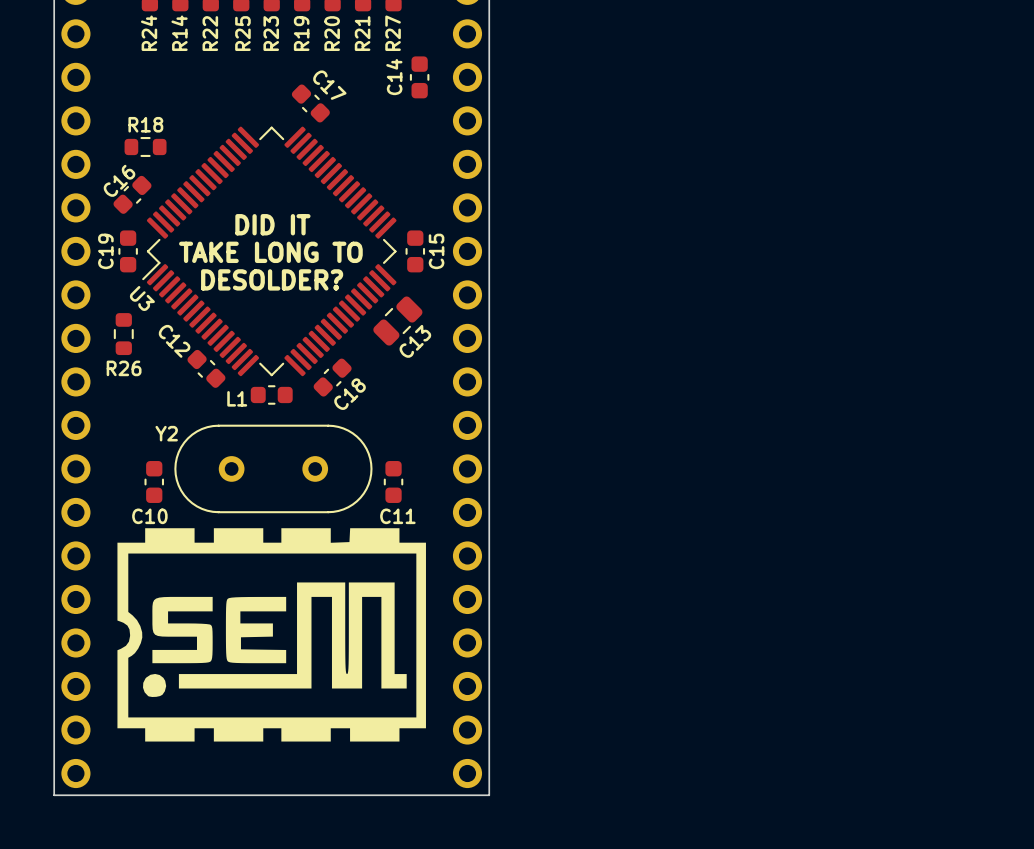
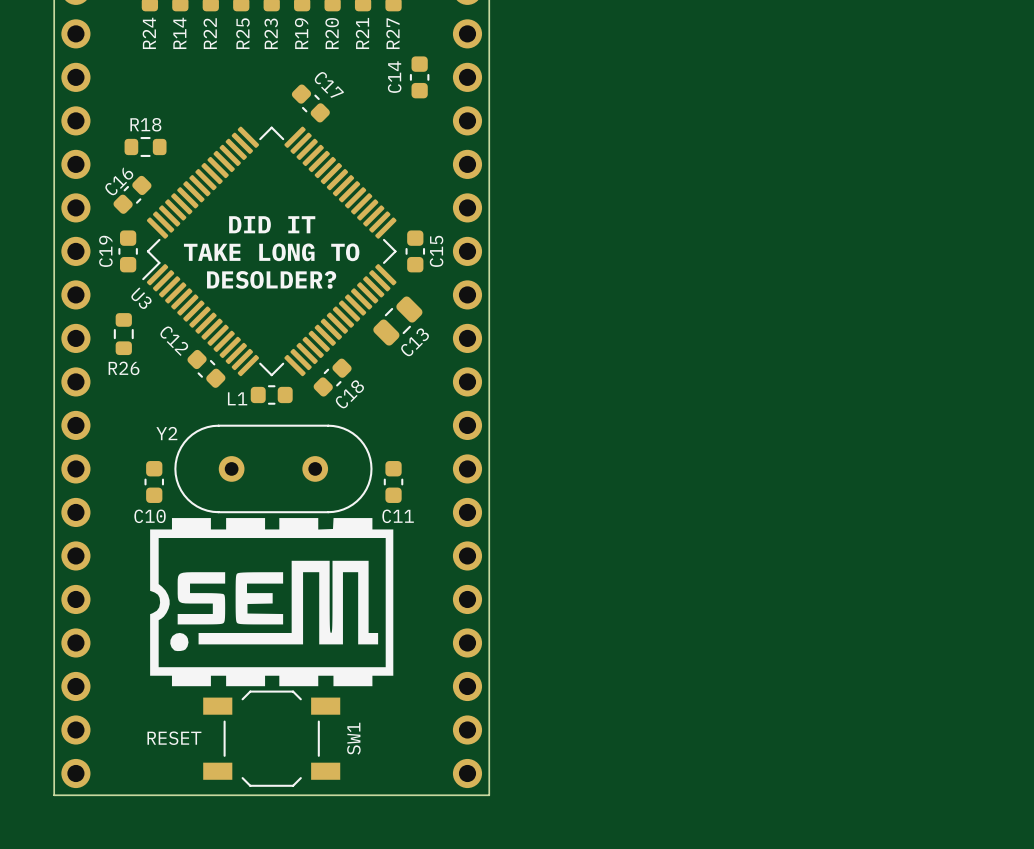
drawing: none -> [150, 518, 394, 687]
drawing: [117, 528, 426, 742] -> none
SW1: none -> RESET (271, 738)

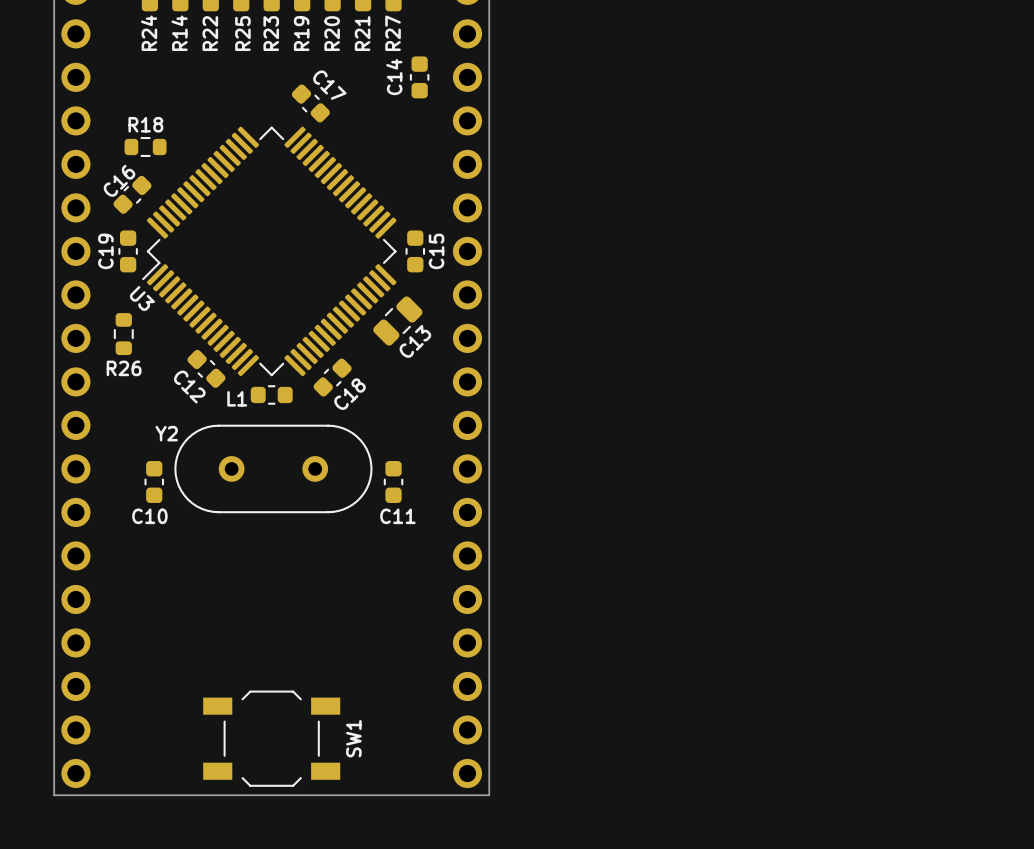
text: DID IT (272, 224) -> none
text: TAKE LONG TO (271, 252) -> none
text: DESOLDER? (271, 279) -> none
C12 name position: C12 (174, 341) -> C12 (189, 387)
drawing: [150, 518, 394, 687] -> none
SW1 value: RESET (174, 738) -> none

